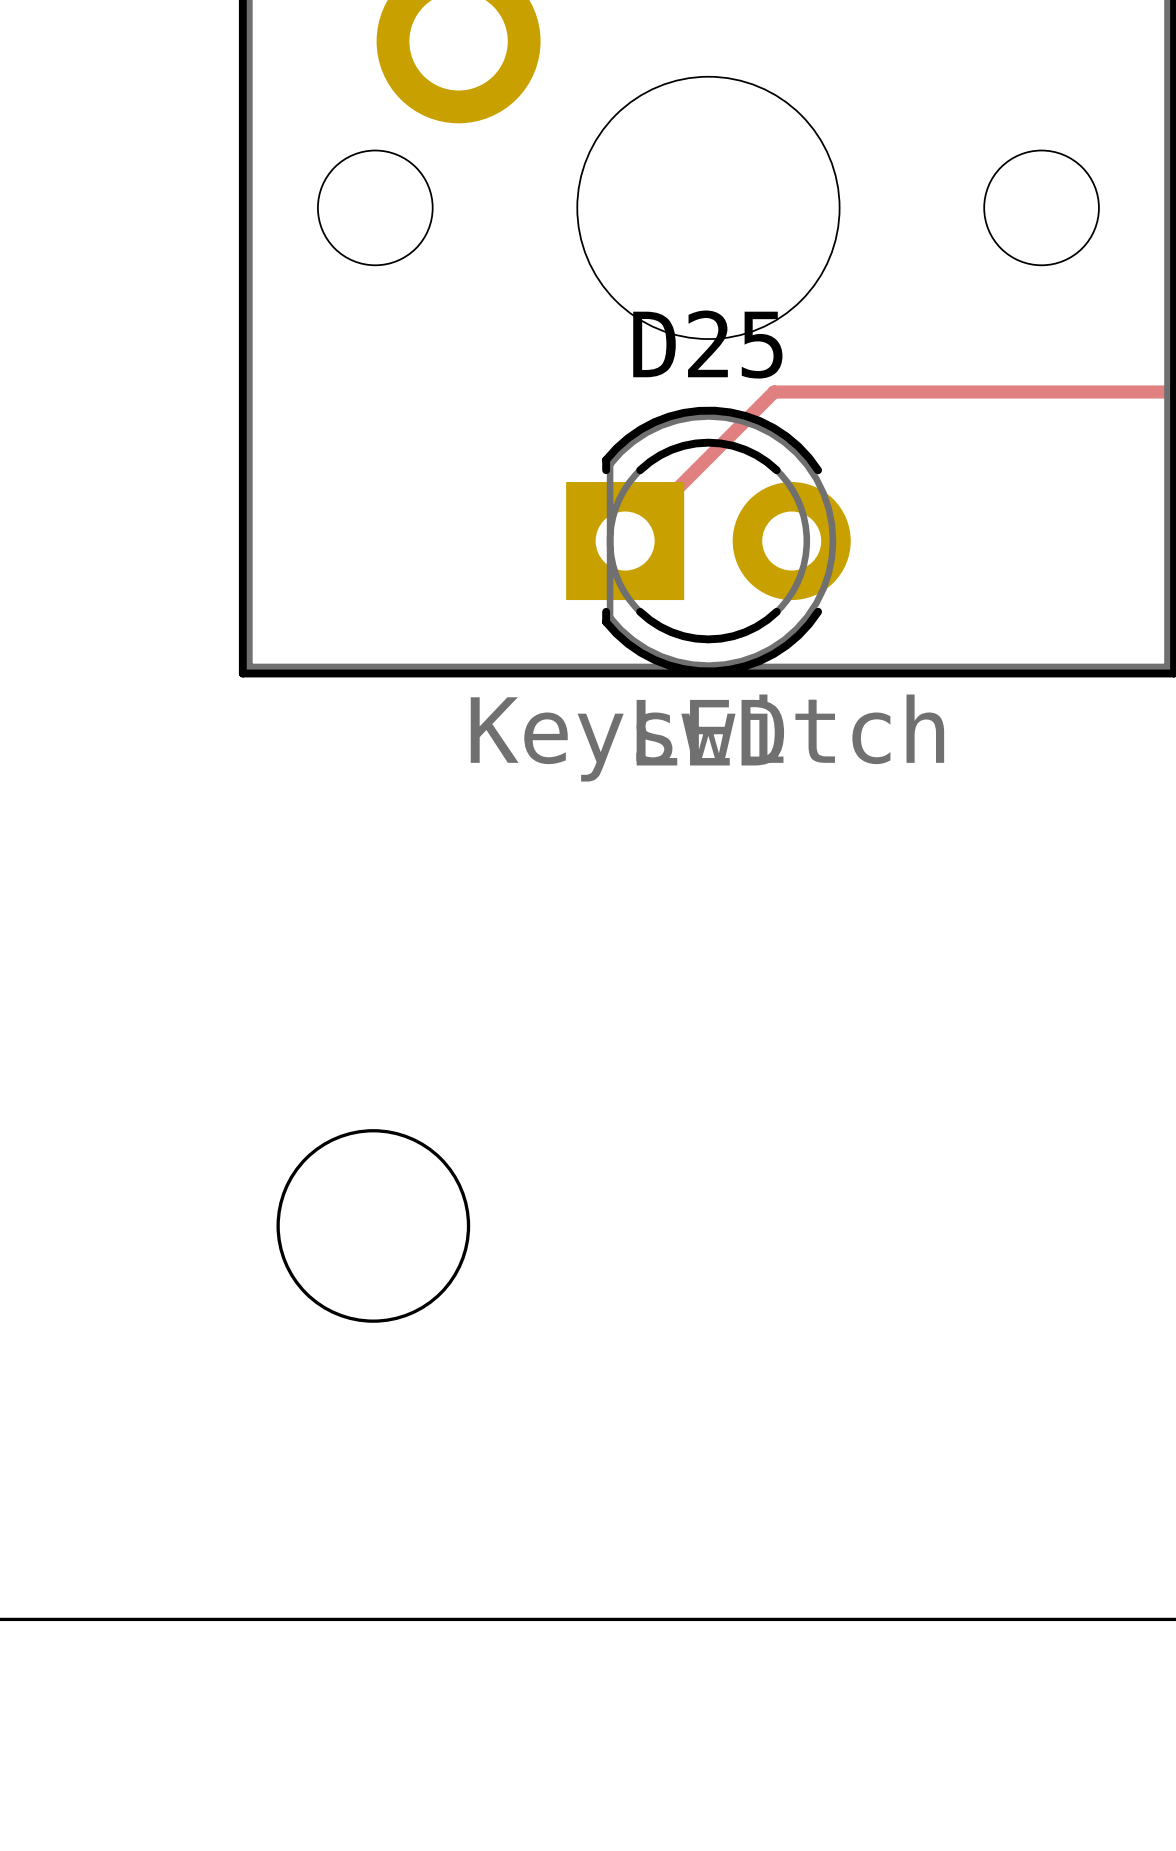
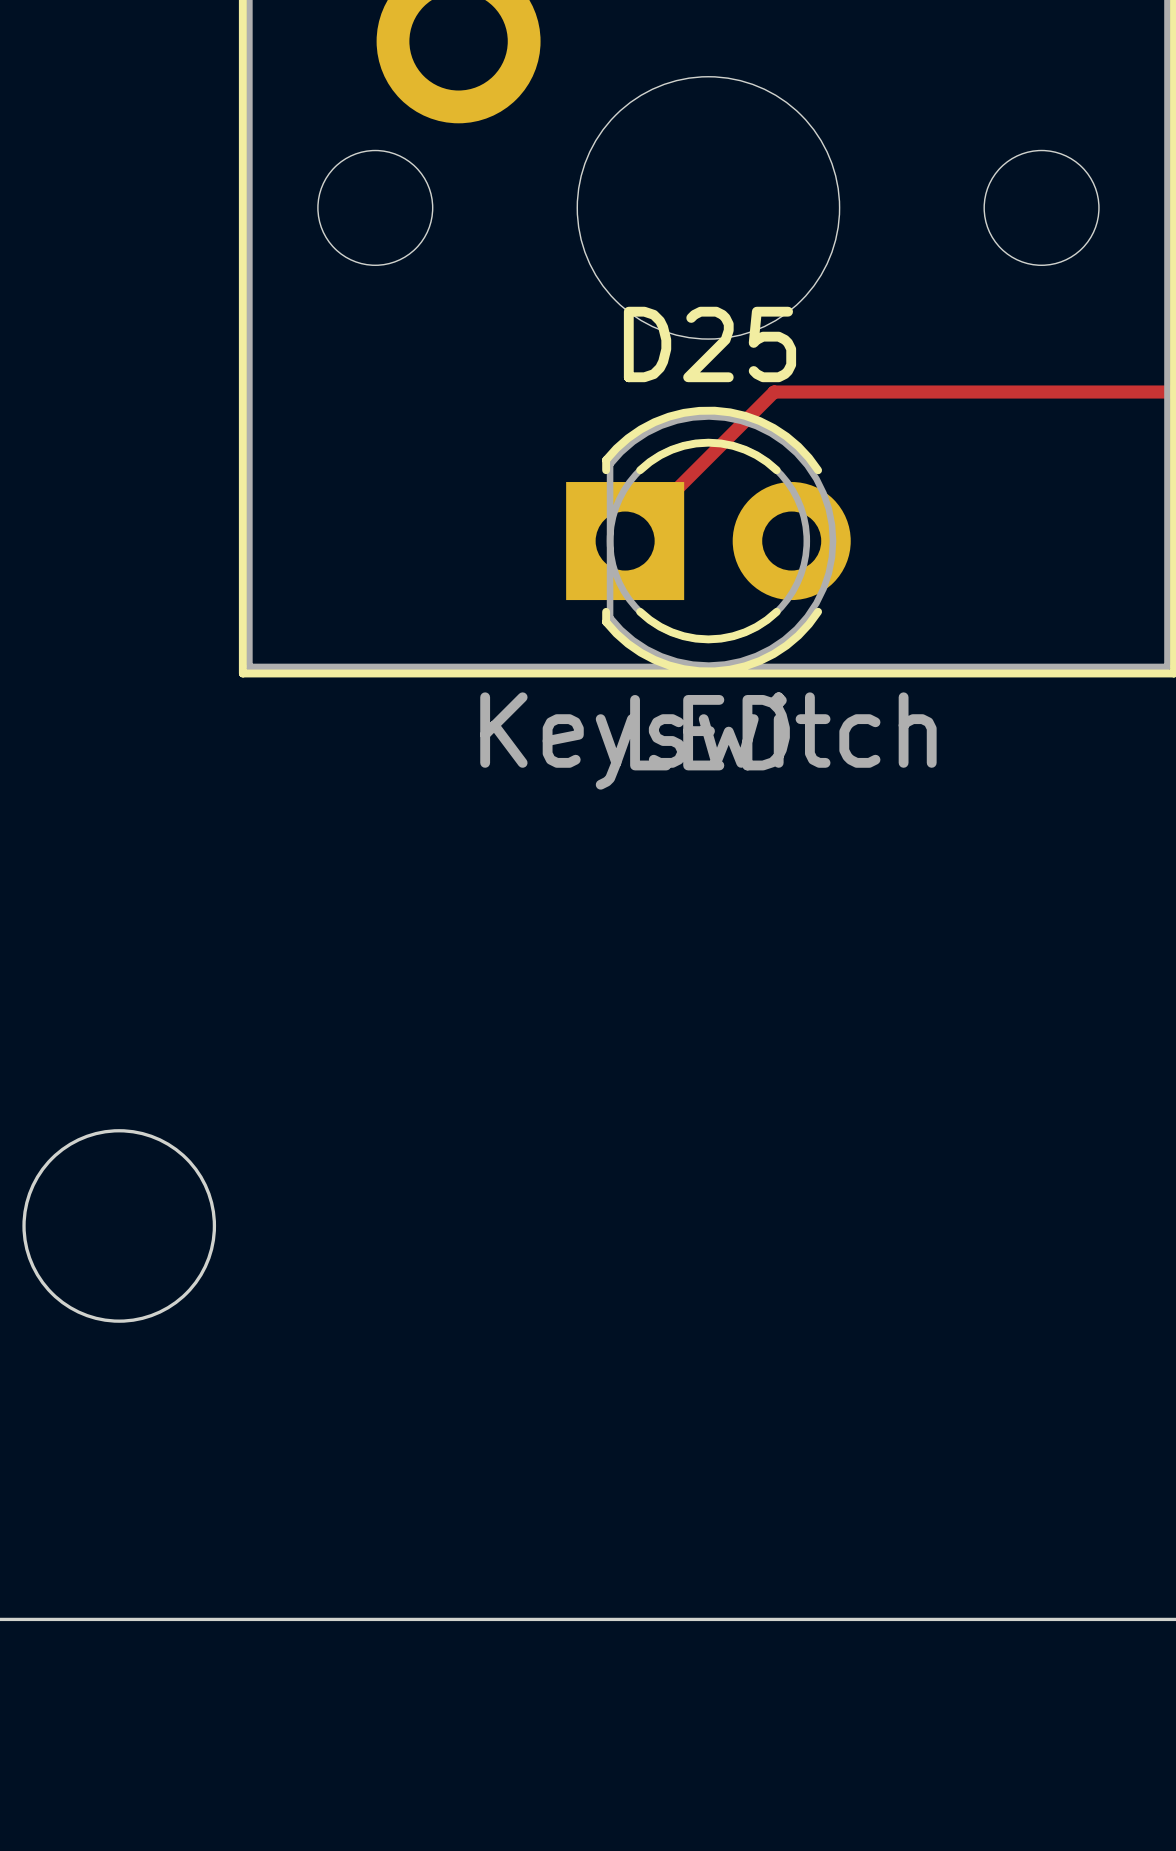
round board edge position: (373, 1225) -> (119, 1225)

